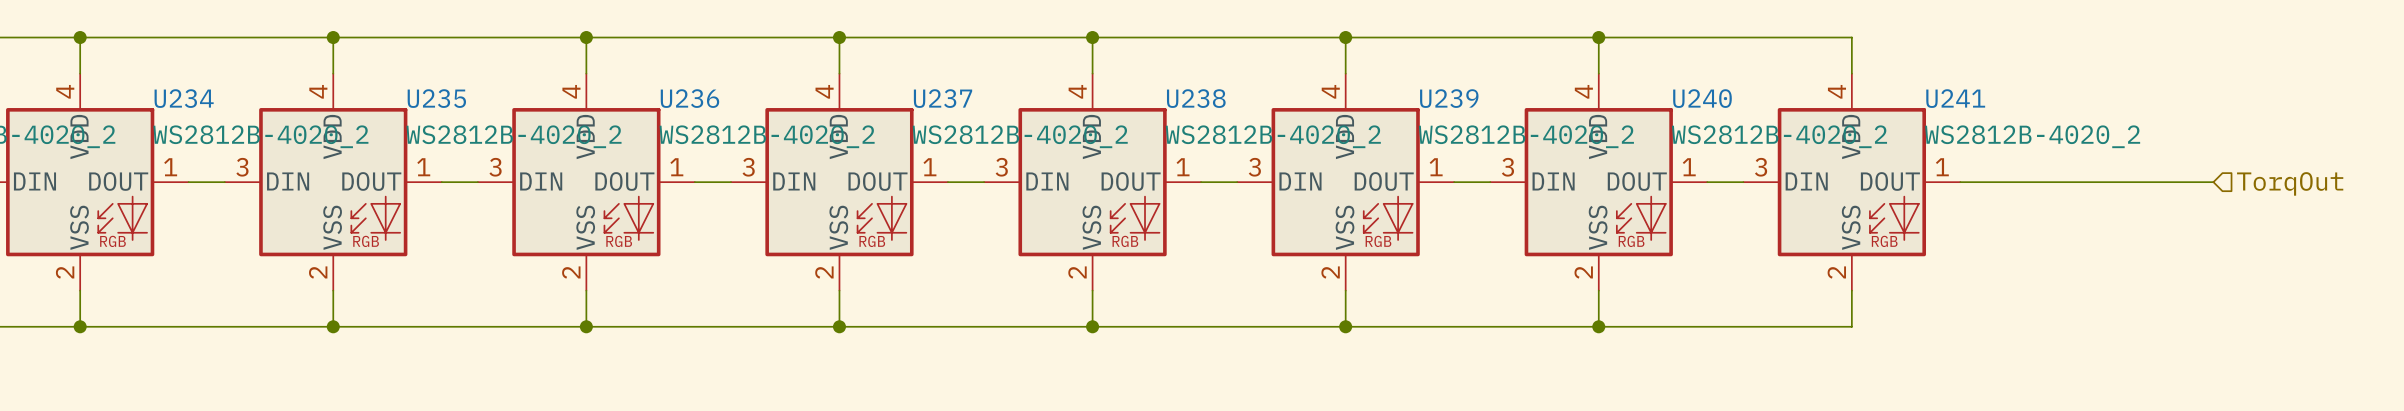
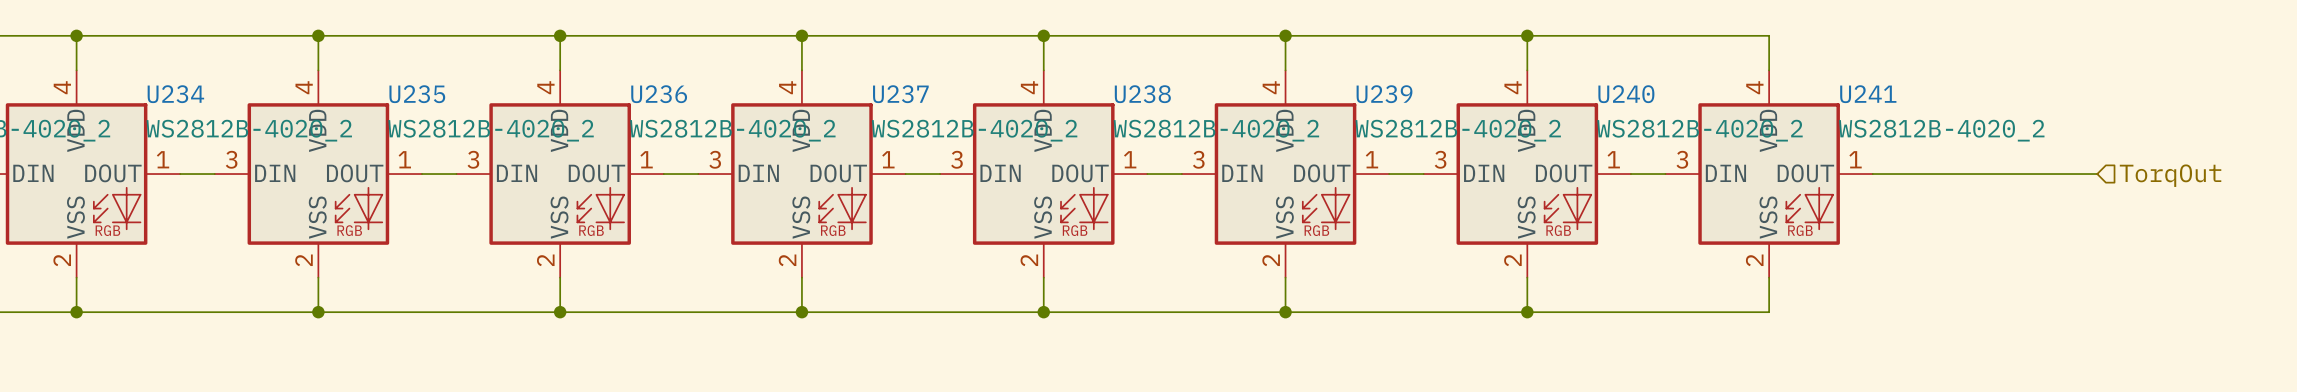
wire: (2195, 182) (2213, 182) -> none
hierarchical label position: TorqOut (2290, 183) -> TorqOut (2170, 175)

